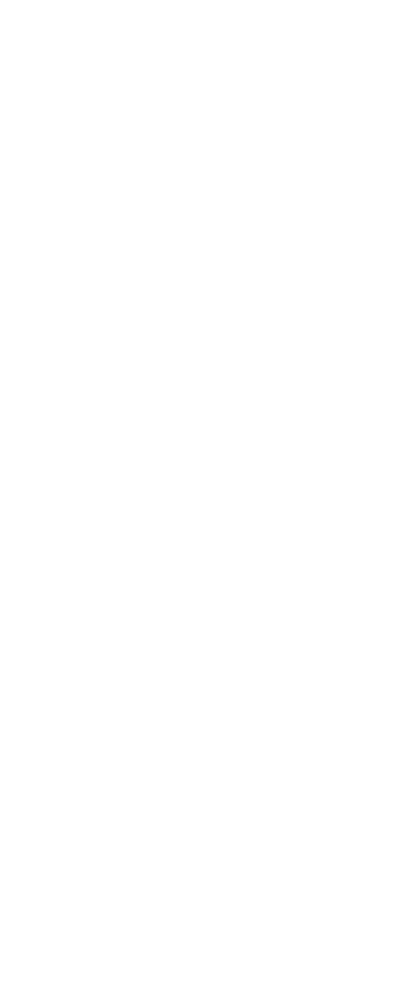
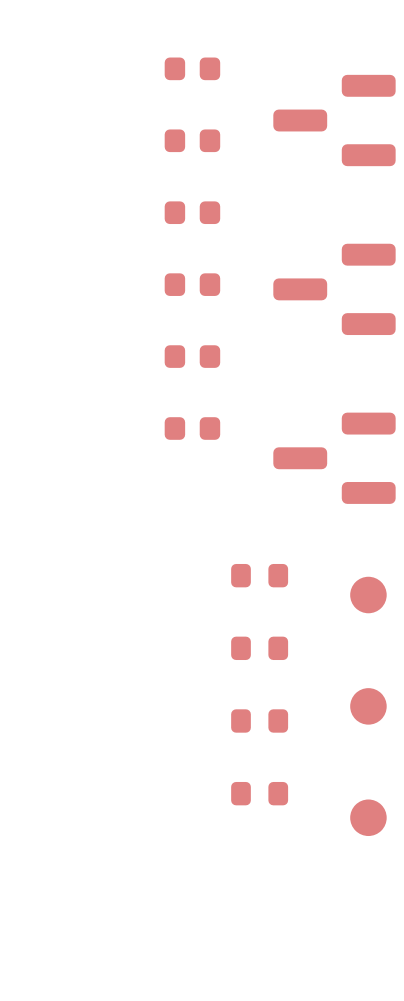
part: none -> (192, 68)
part: none -> (334, 120)
part: none -> (192, 140)
part: none -> (192, 212)
part: none -> (192, 284)
part: none -> (334, 289)
part: none -> (192, 356)
part: none -> (192, 428)
part: none -> (334, 458)
part: none -> (259, 575)
part: none -> (368, 595)
part: none -> (259, 648)
part: none -> (368, 706)
part: none -> (259, 720)
part: none -> (259, 793)
part: none -> (368, 817)

